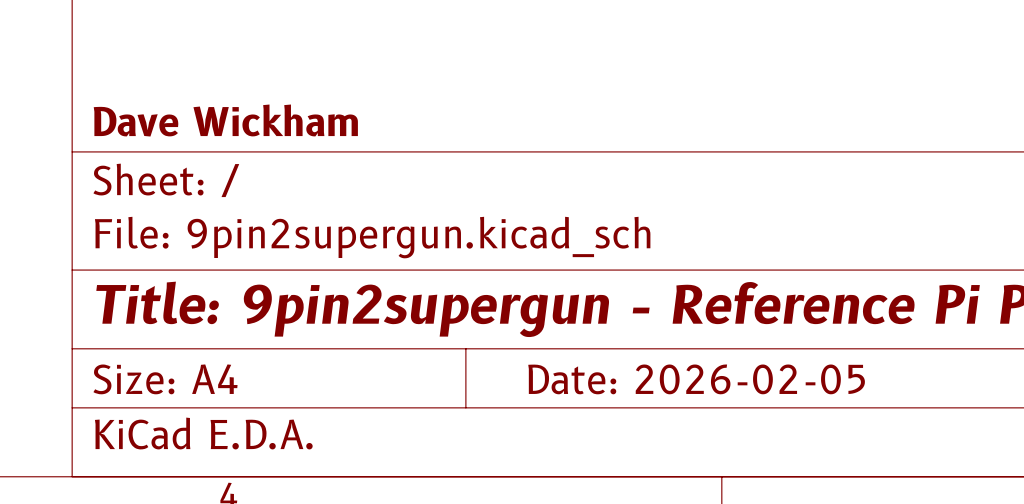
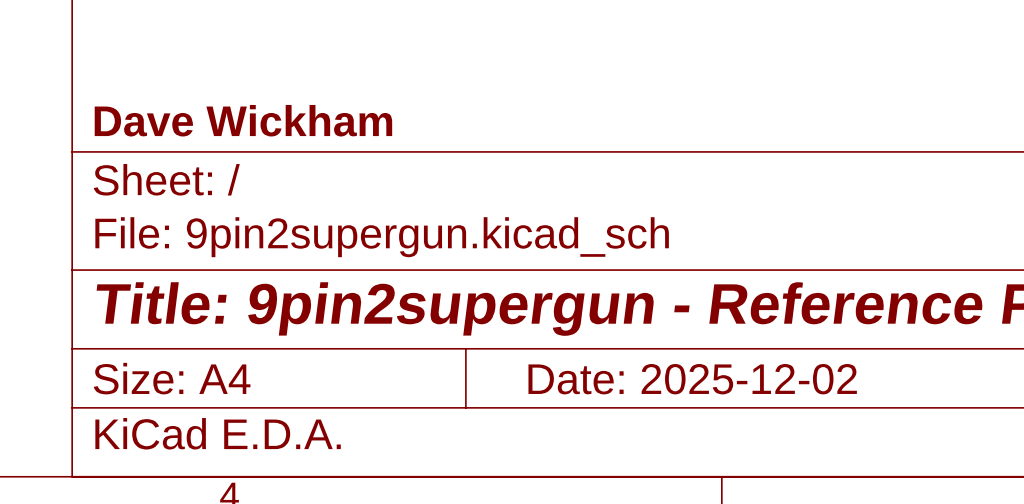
title block: Date: 2026-02-05 (696, 379) -> Date: 2025-12-02 (692, 379)

